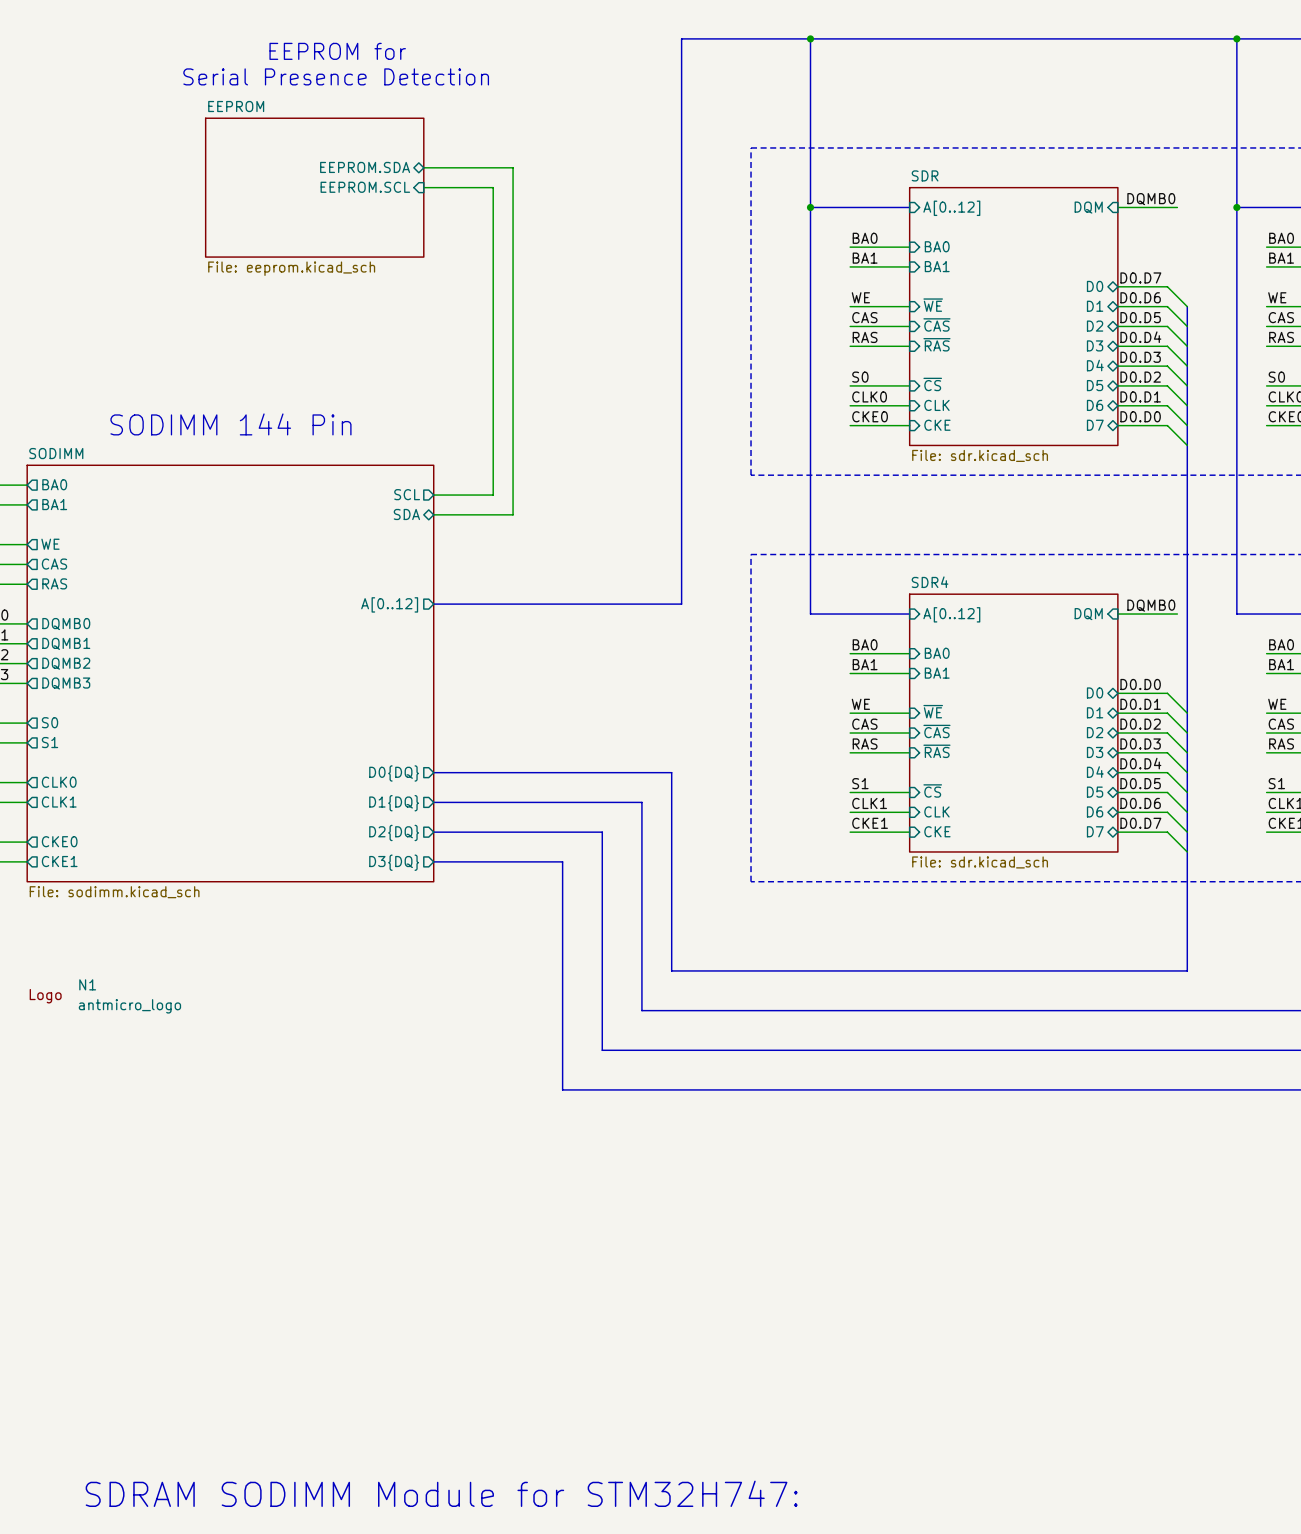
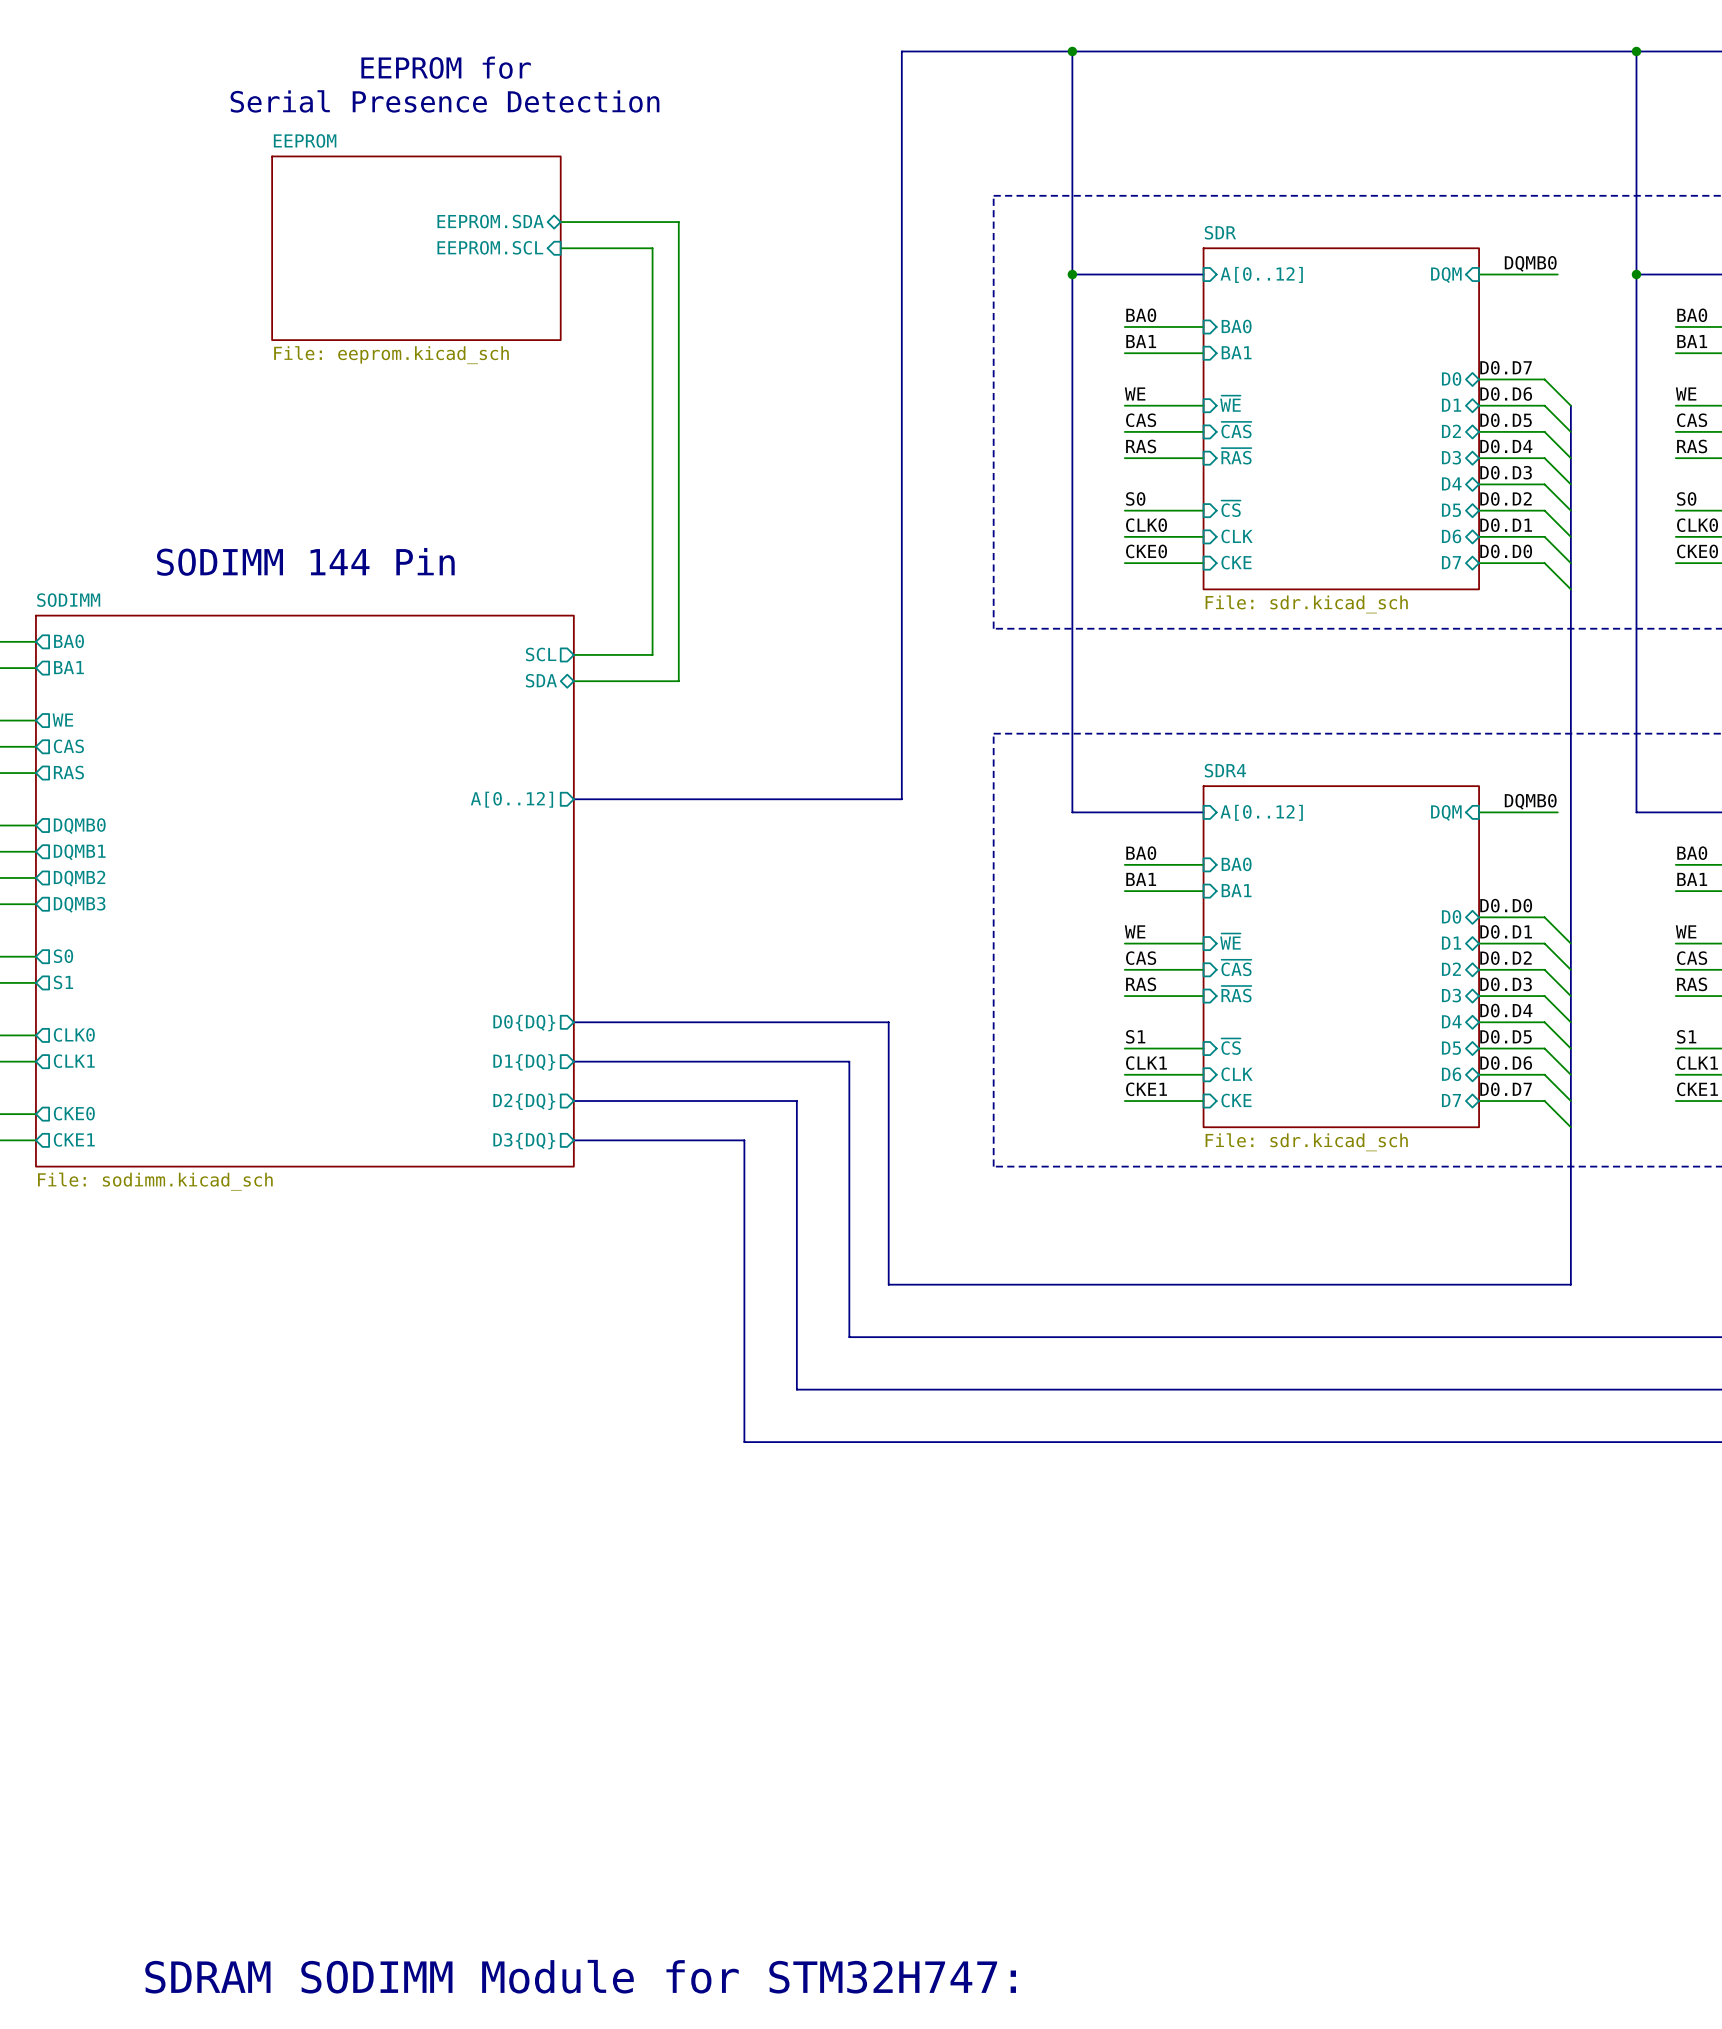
N1: antmicro_logo (105, 996) -> none

